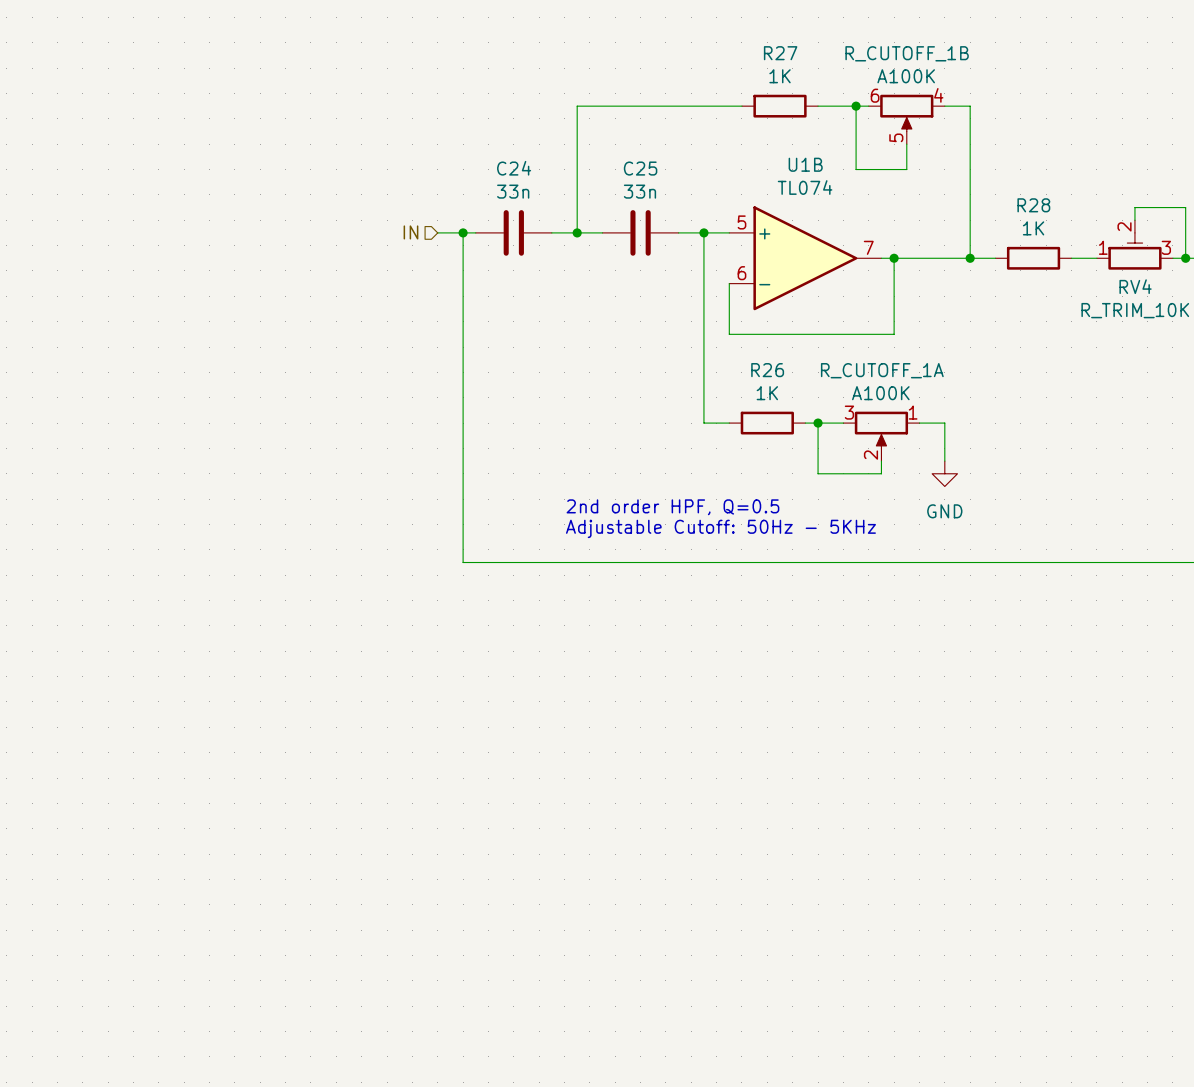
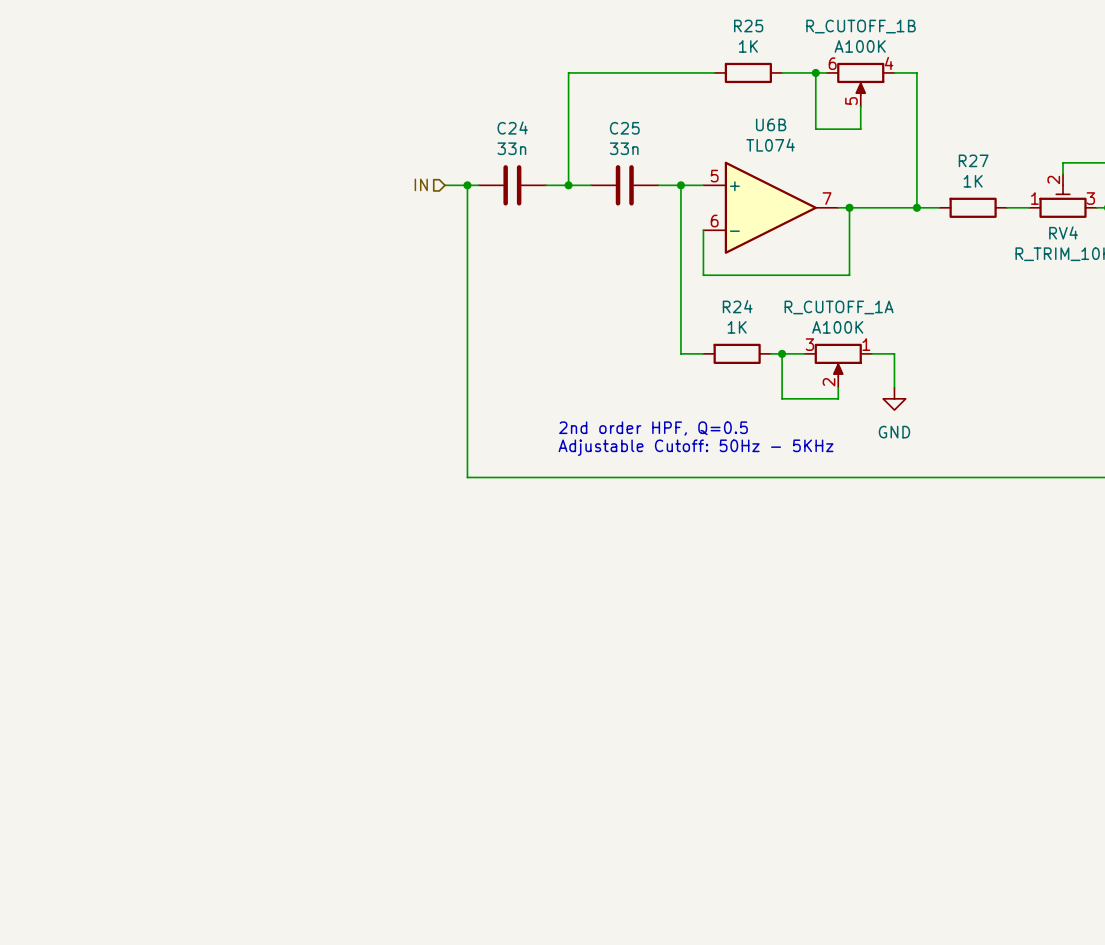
R27 name: R27 (780, 53) -> R25 (748, 26)
U1B name: U1B (805, 164) -> U6B (771, 124)
R28 name: R28 (1033, 205) -> R27 (973, 160)
R26 name: R26 (767, 370) -> R24 (737, 306)

